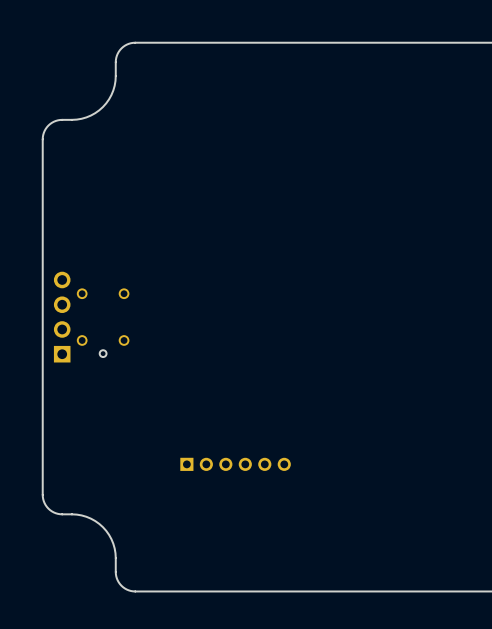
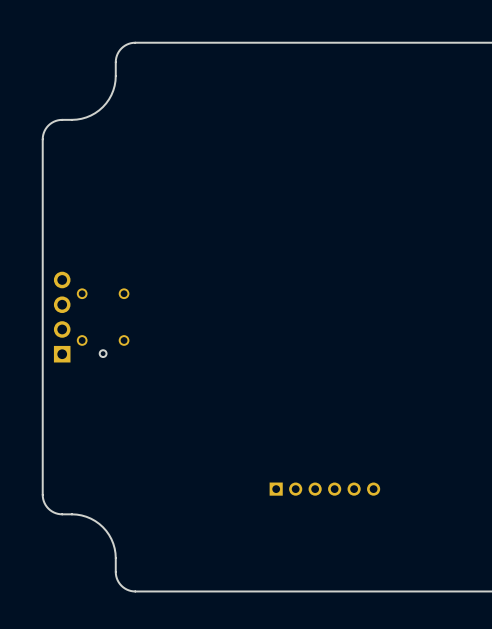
part position: (235, 464) -> (324, 489)

